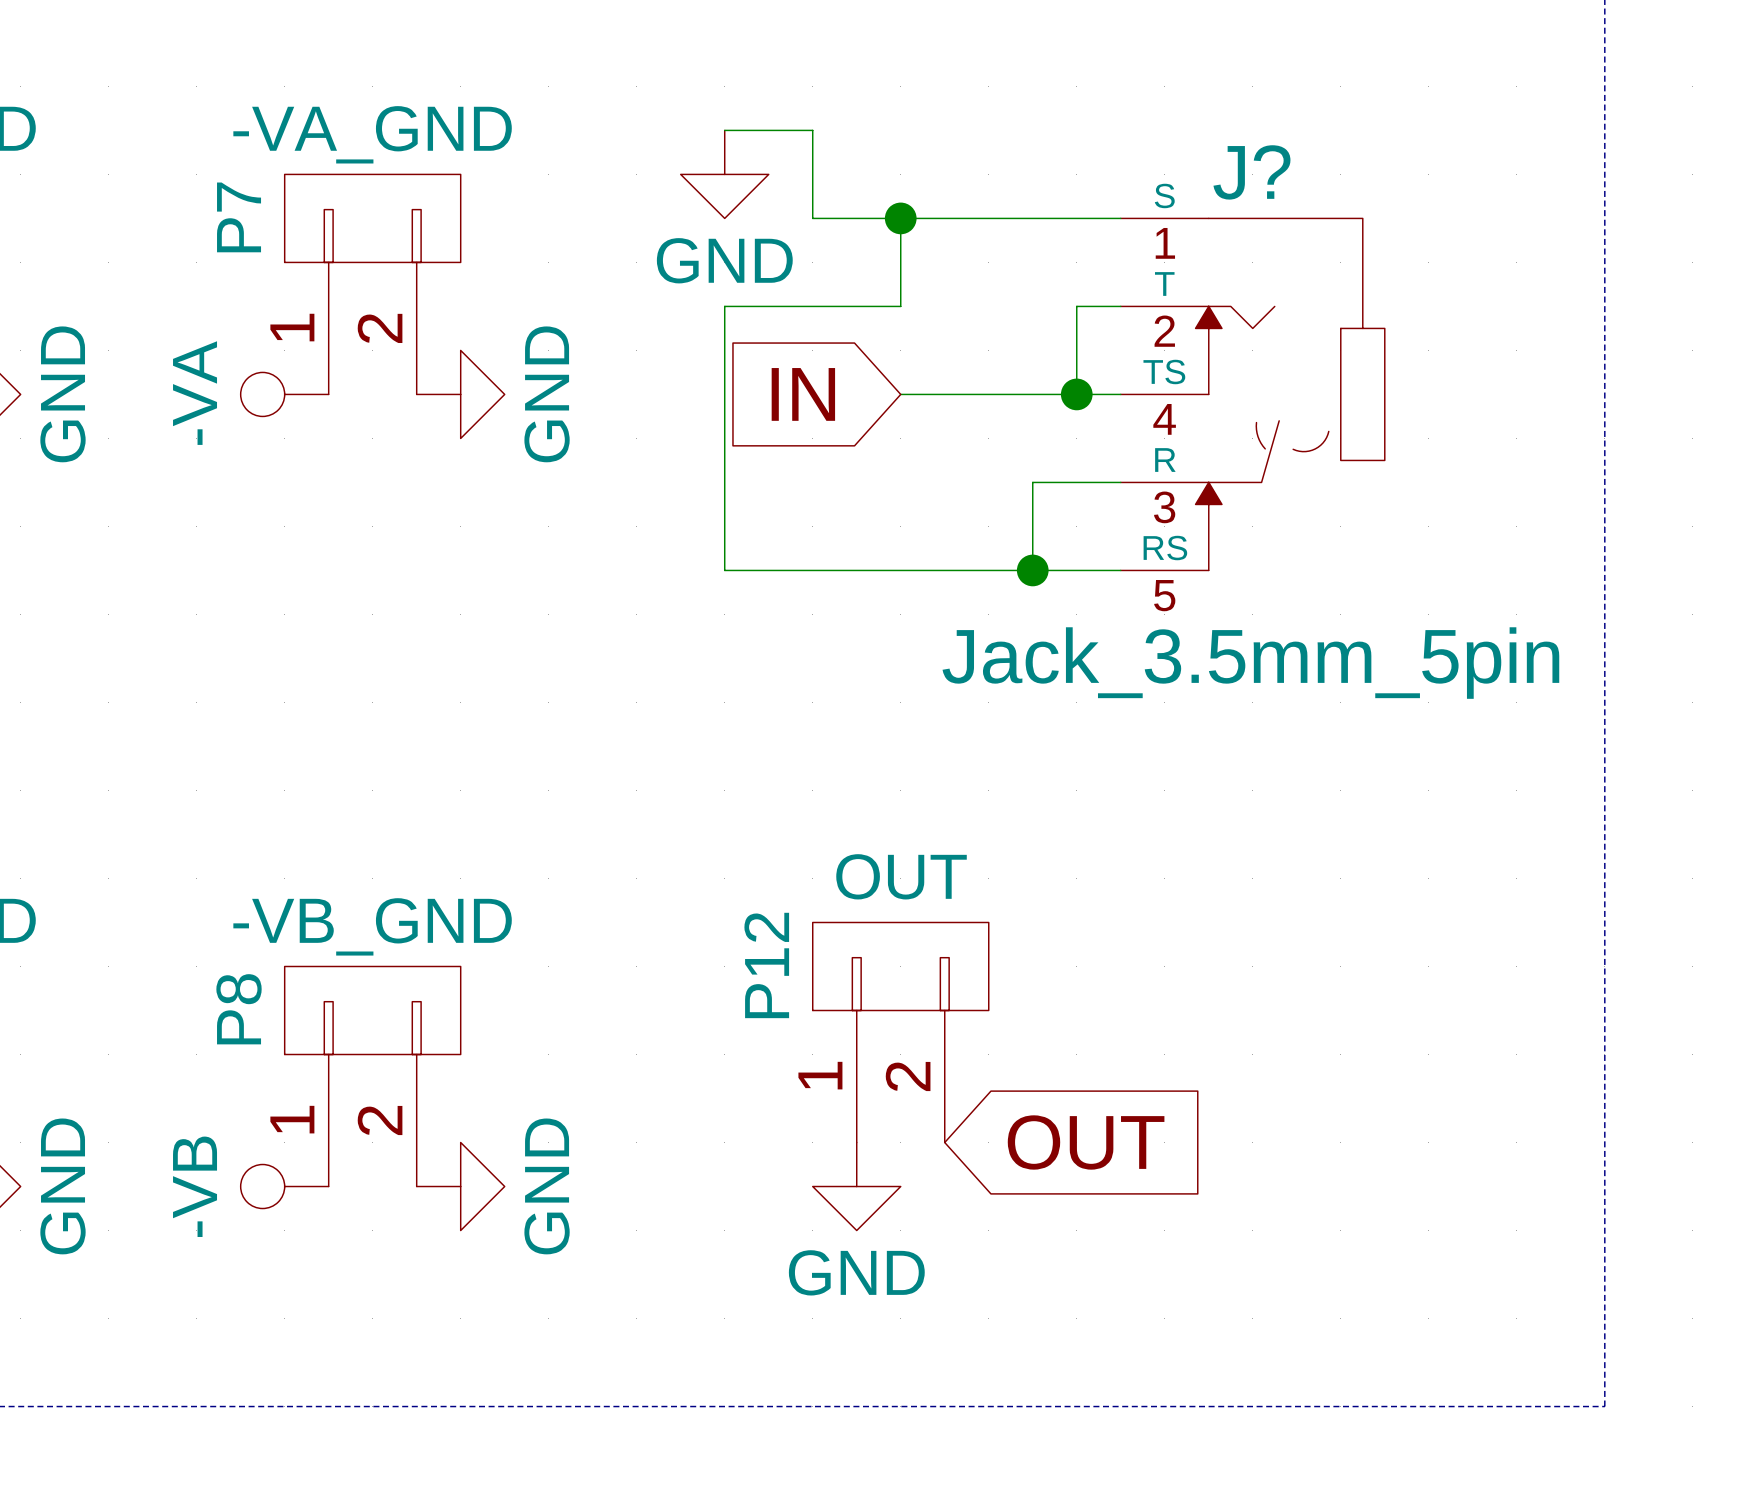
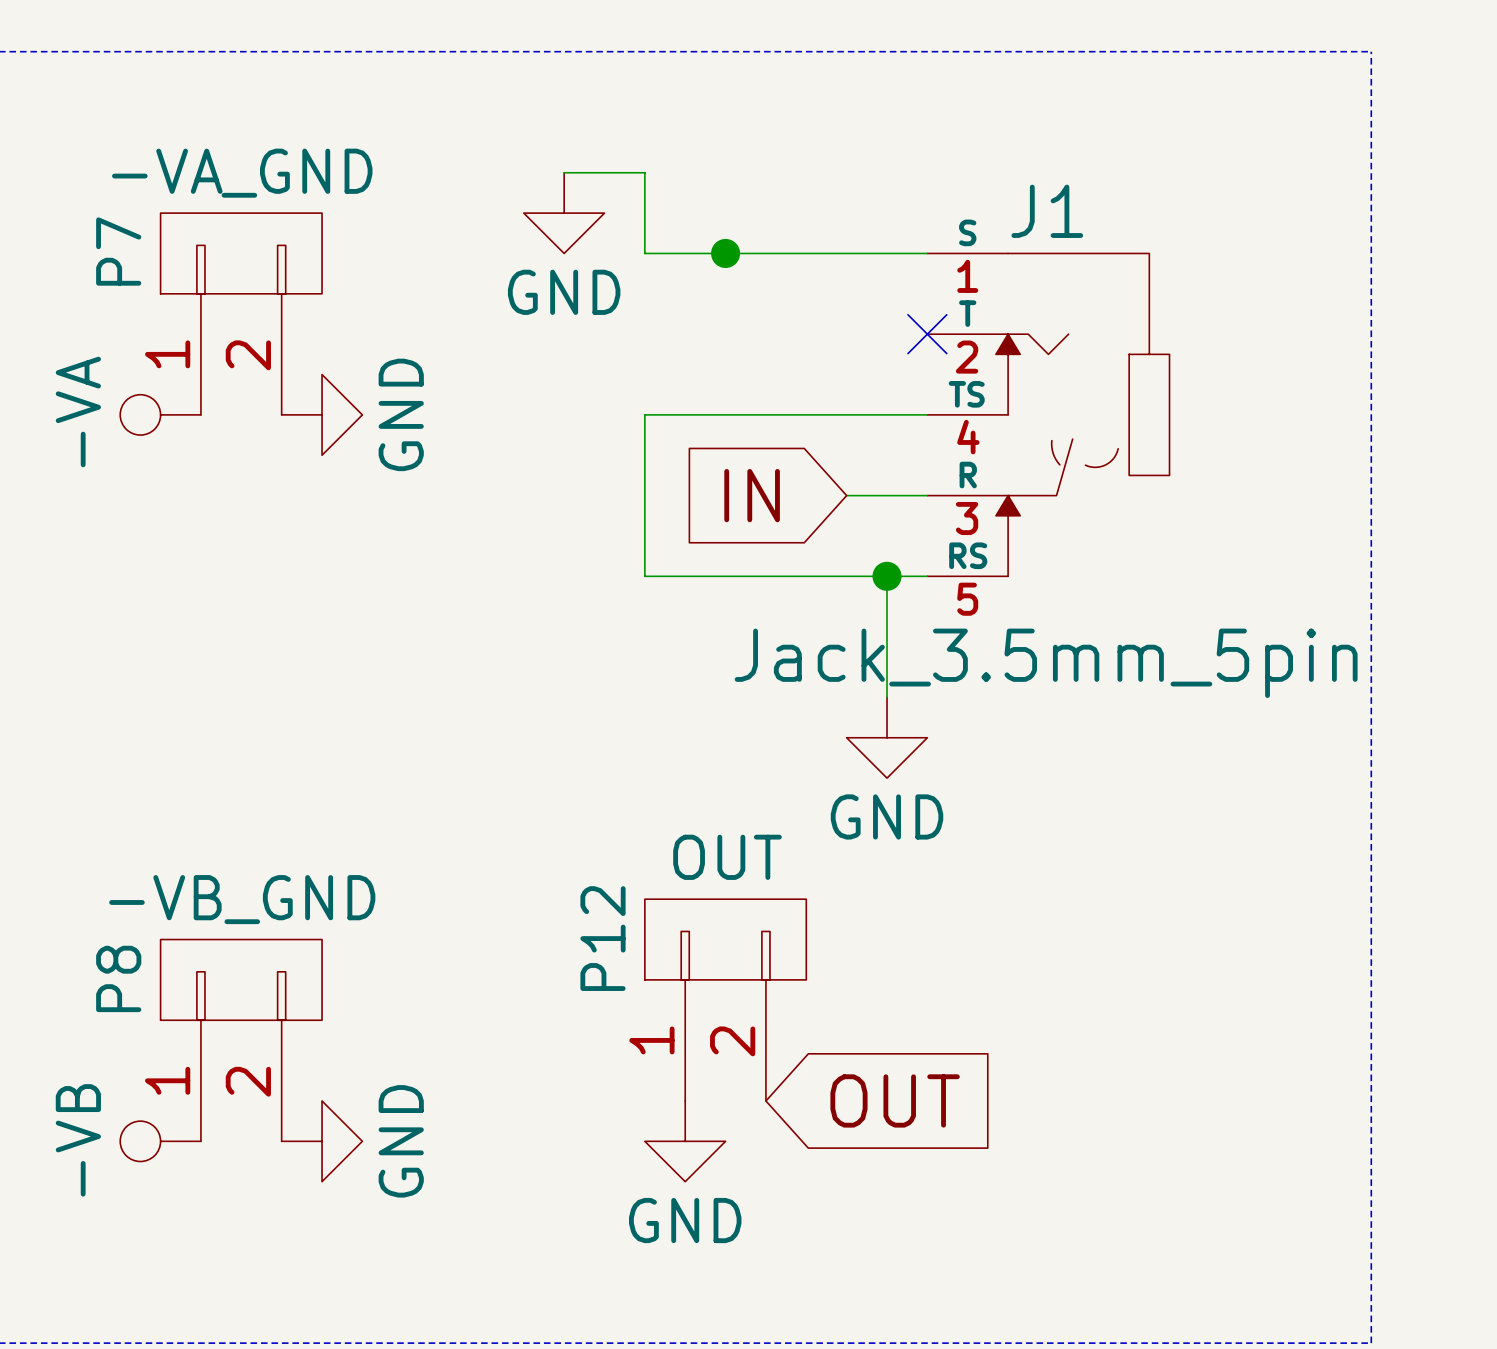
J? name: J? (1251, 172) -> J1 (1047, 211)
wire: (900, 218) (900, 306) (724, 306) (724, 570) (812, 570) -> (725, 414) (644, 414) (644, 576)
wire: (1120, 306) (1076, 306) (1076, 394) -> none
no-connect mark: none -> (927, 334)
global label position: IN (803, 394) -> IN (752, 495)
junction: (1076, 394) -> none
wire: (1032, 482) (1032, 570) -> none
junction position: (1032, 570) -> (887, 576)
wire: none -> (887, 576) (887, 697)
power symbol: none -> GND (887, 737)

